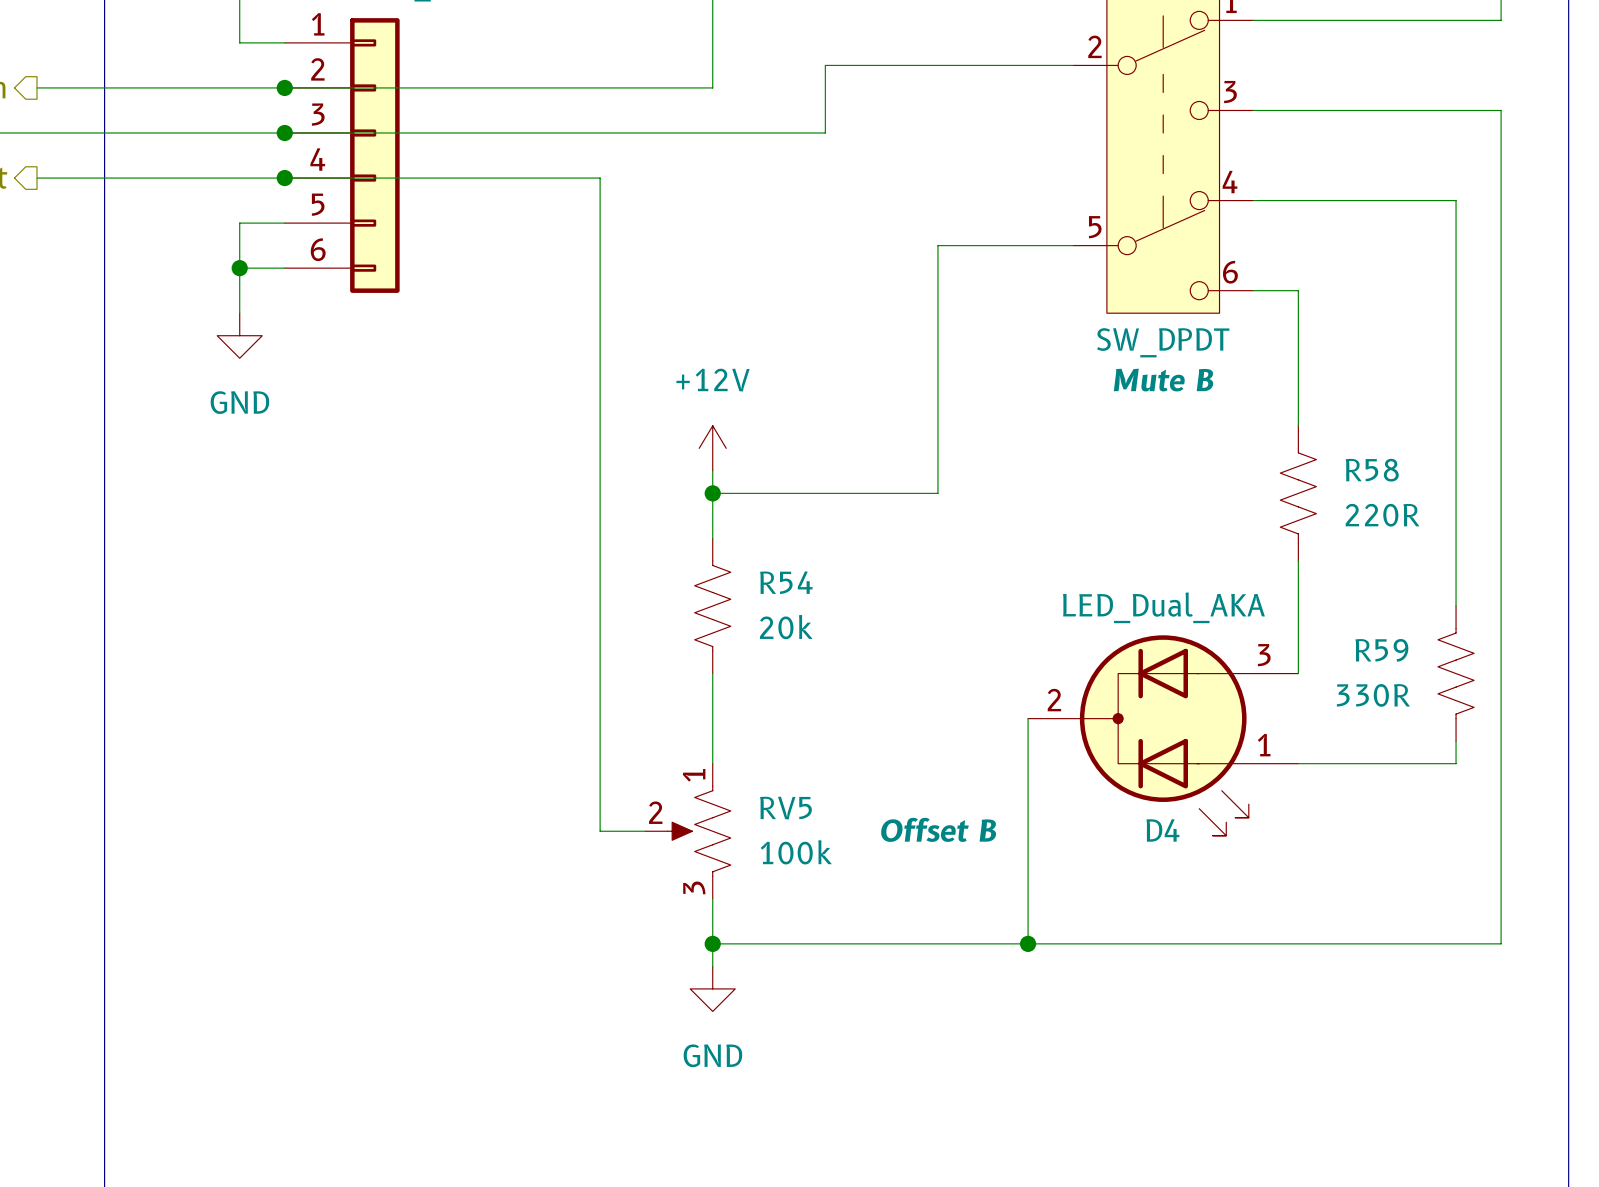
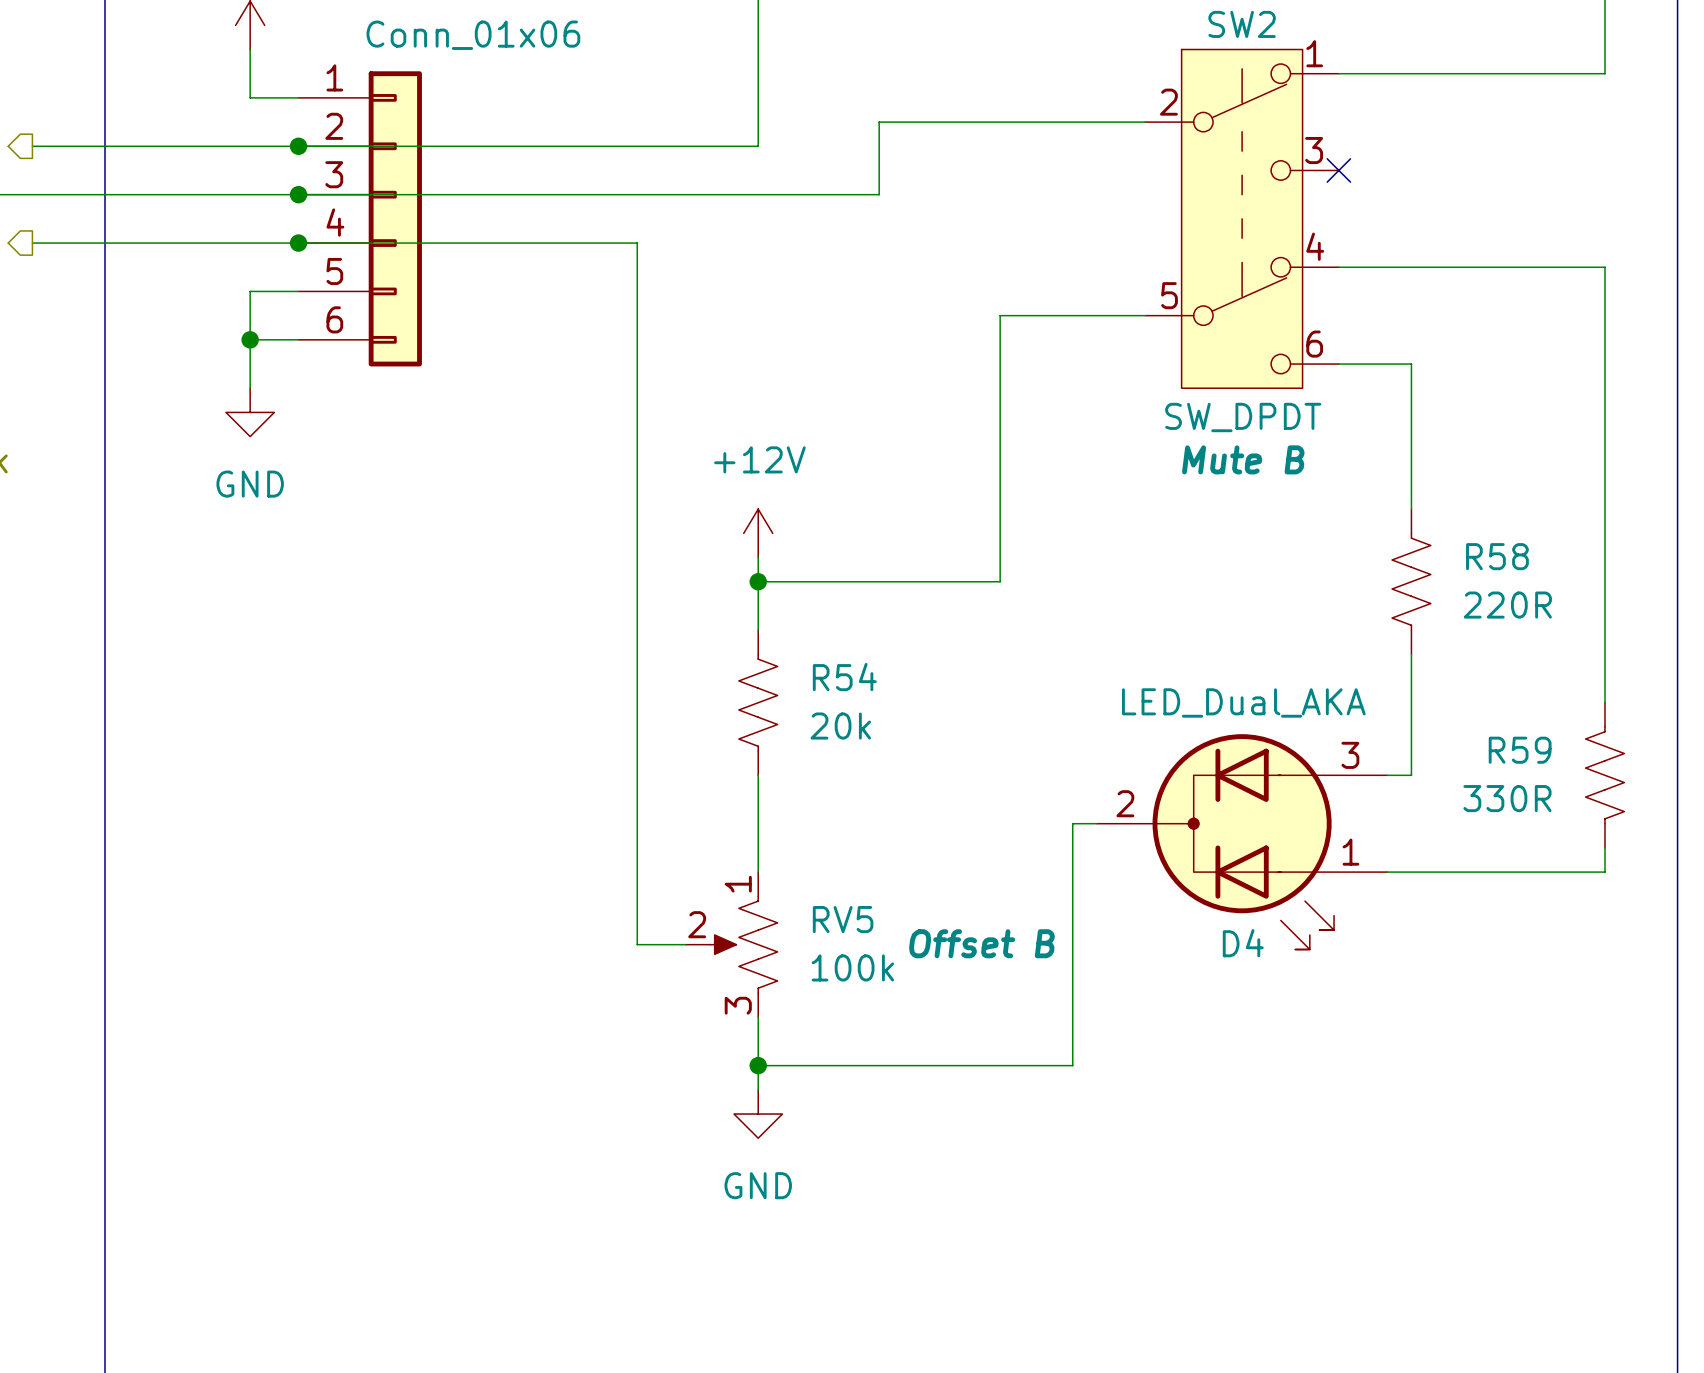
wire: (1253, 110) (1501, 110) (1501, 200) -> (1556, 267) (1604, 267)
no-connect mark: none -> (1338, 170)
wire: (1456, 200) (1456, 606) -> none
wire: (1298, 290) (1298, 425) -> (1387, 364) (1411, 364) (1411, 509)
R58 position: (1298, 493) -> (1411, 581)
wire: (1298, 560) (1298, 673) -> (1411, 654) (1411, 775) (1387, 775)
wire: (1501, 606) (1501, 741) -> none
R59 position: (1456, 673) -> (1604, 775)
wire: (1028, 718) (1028, 943) -> (1096, 823) (1072, 823) (1072, 1065)
wire: (1456, 741) (1456, 763) -> (1604, 872) (1556, 872)
wire: (1501, 763) (1501, 943) (1005, 943) -> none
RV5 text position: Offset B (938, 829) -> Offset B (981, 943)
junction: (1028, 943) -> none

